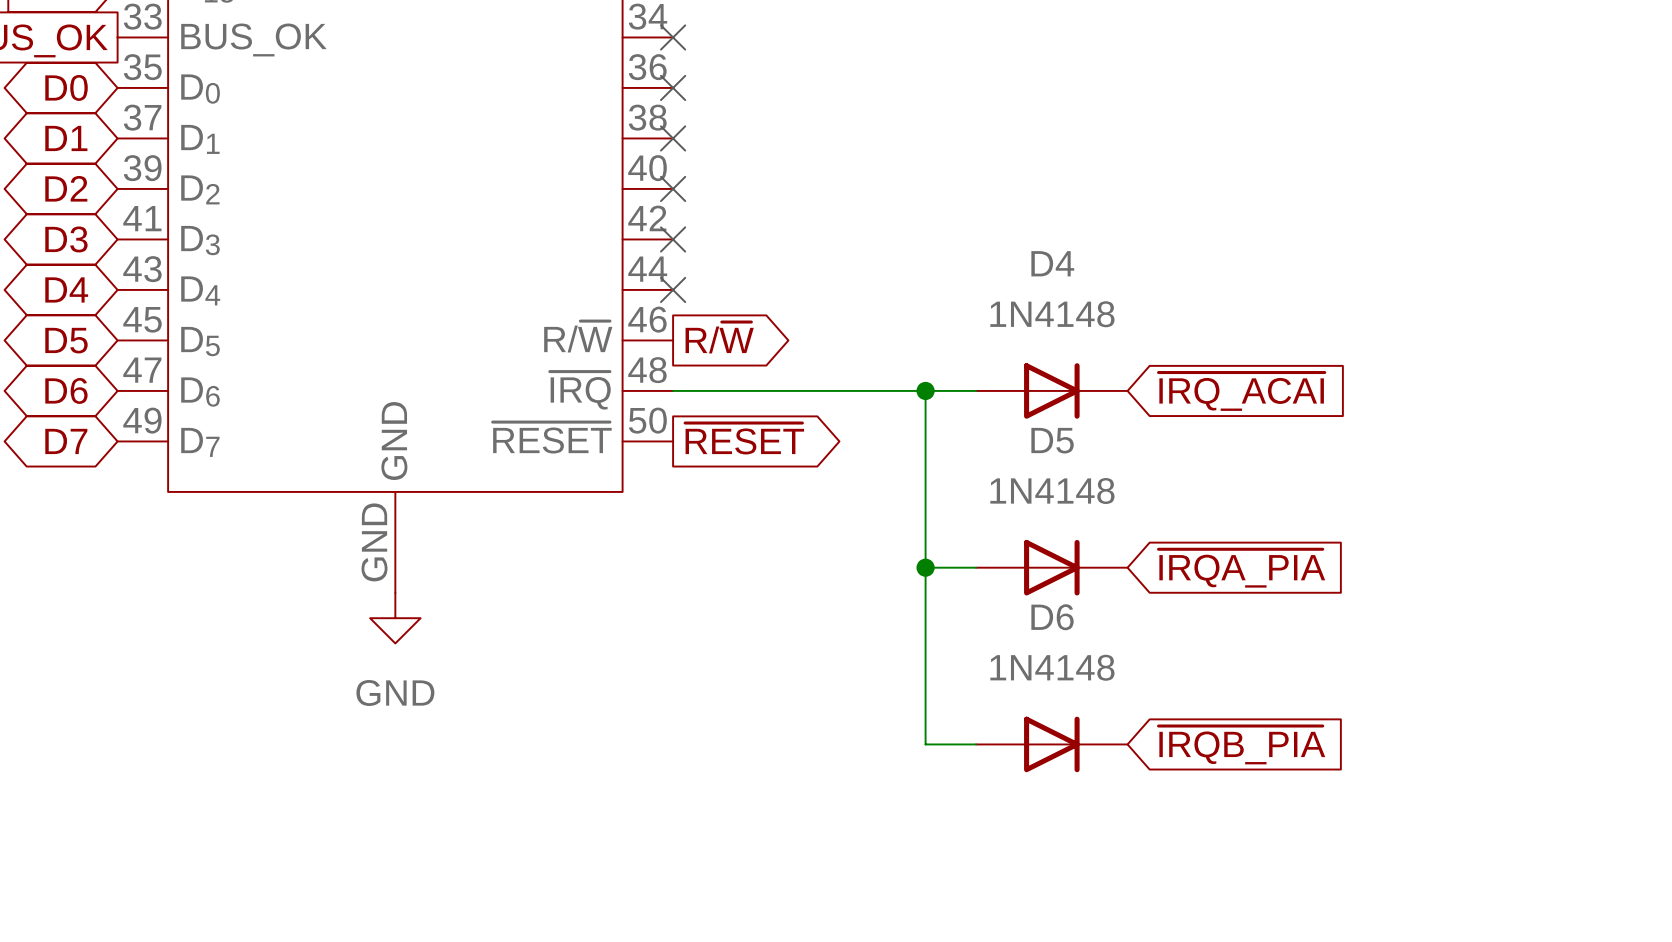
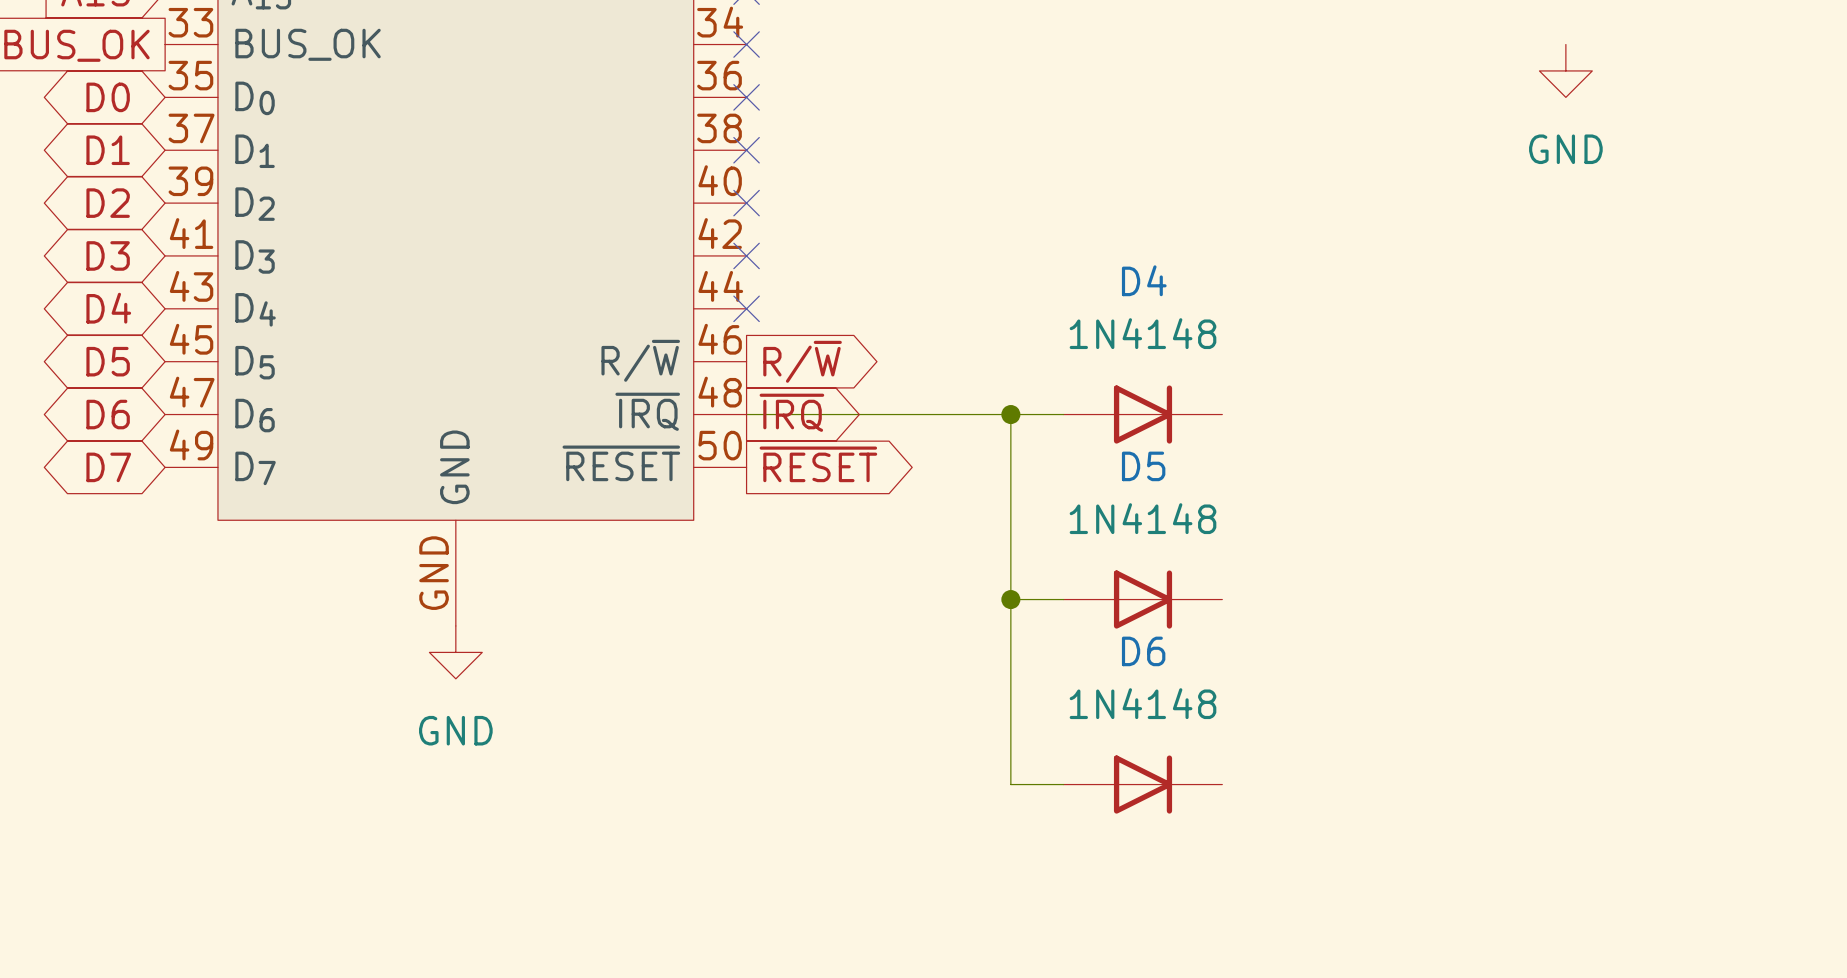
power symbol: none -> GND (1565, 70)
global label: none -> ~{IRQ} (791, 412)
global label: ~{IRQ_ACAI} (1241, 391) -> none
global label: ~{IRQA_PIA} (1241, 568) -> none
global label: ~{IRQB_PIA} (1241, 745) -> none

